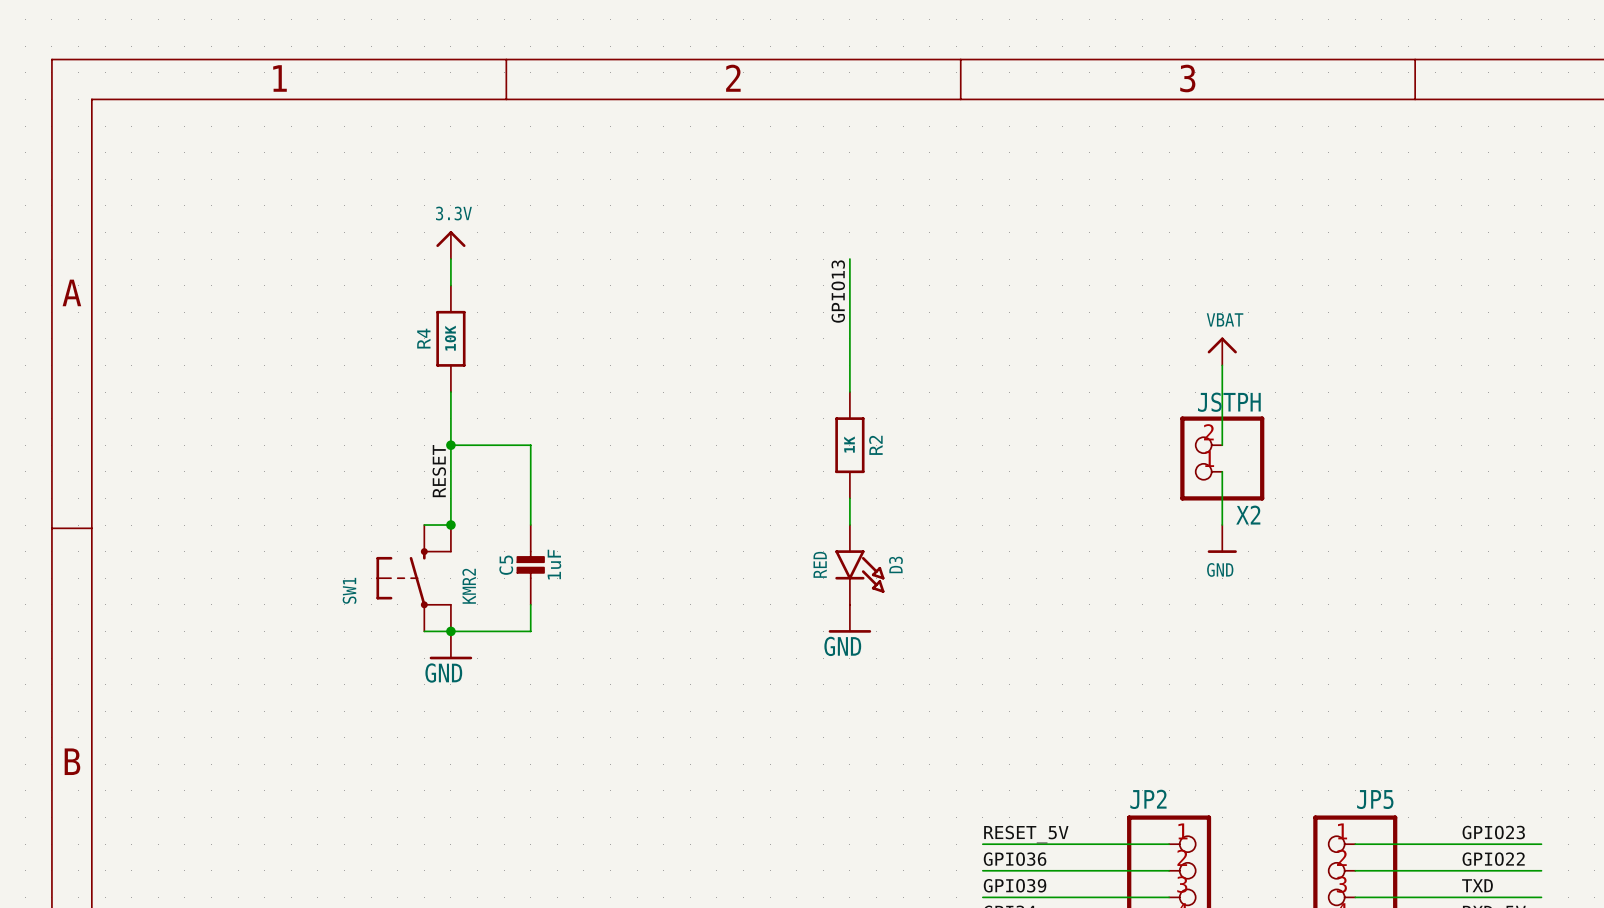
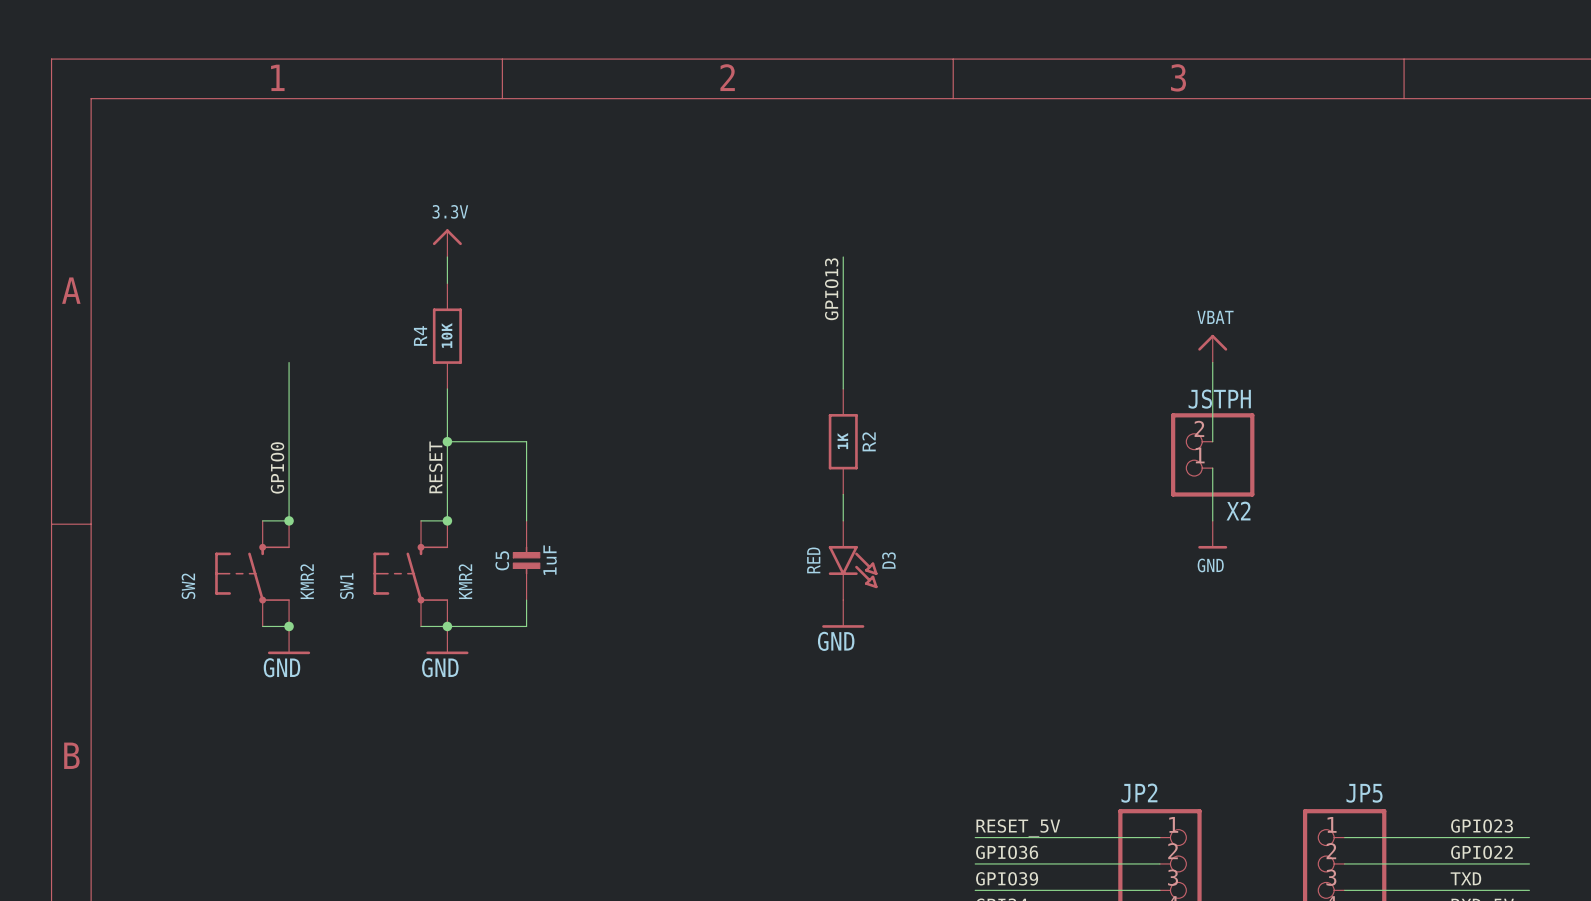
wire: none -> (289, 362) (289, 520) (262, 520)
label: none -> GPIO0 (277, 467)
junction: none -> (289, 520)
SW2: none -> KMR2 (252, 573)
wire: none -> (262, 626) (289, 626)
junction: none -> (289, 626)
power symbol: none -> GND (289, 640)

